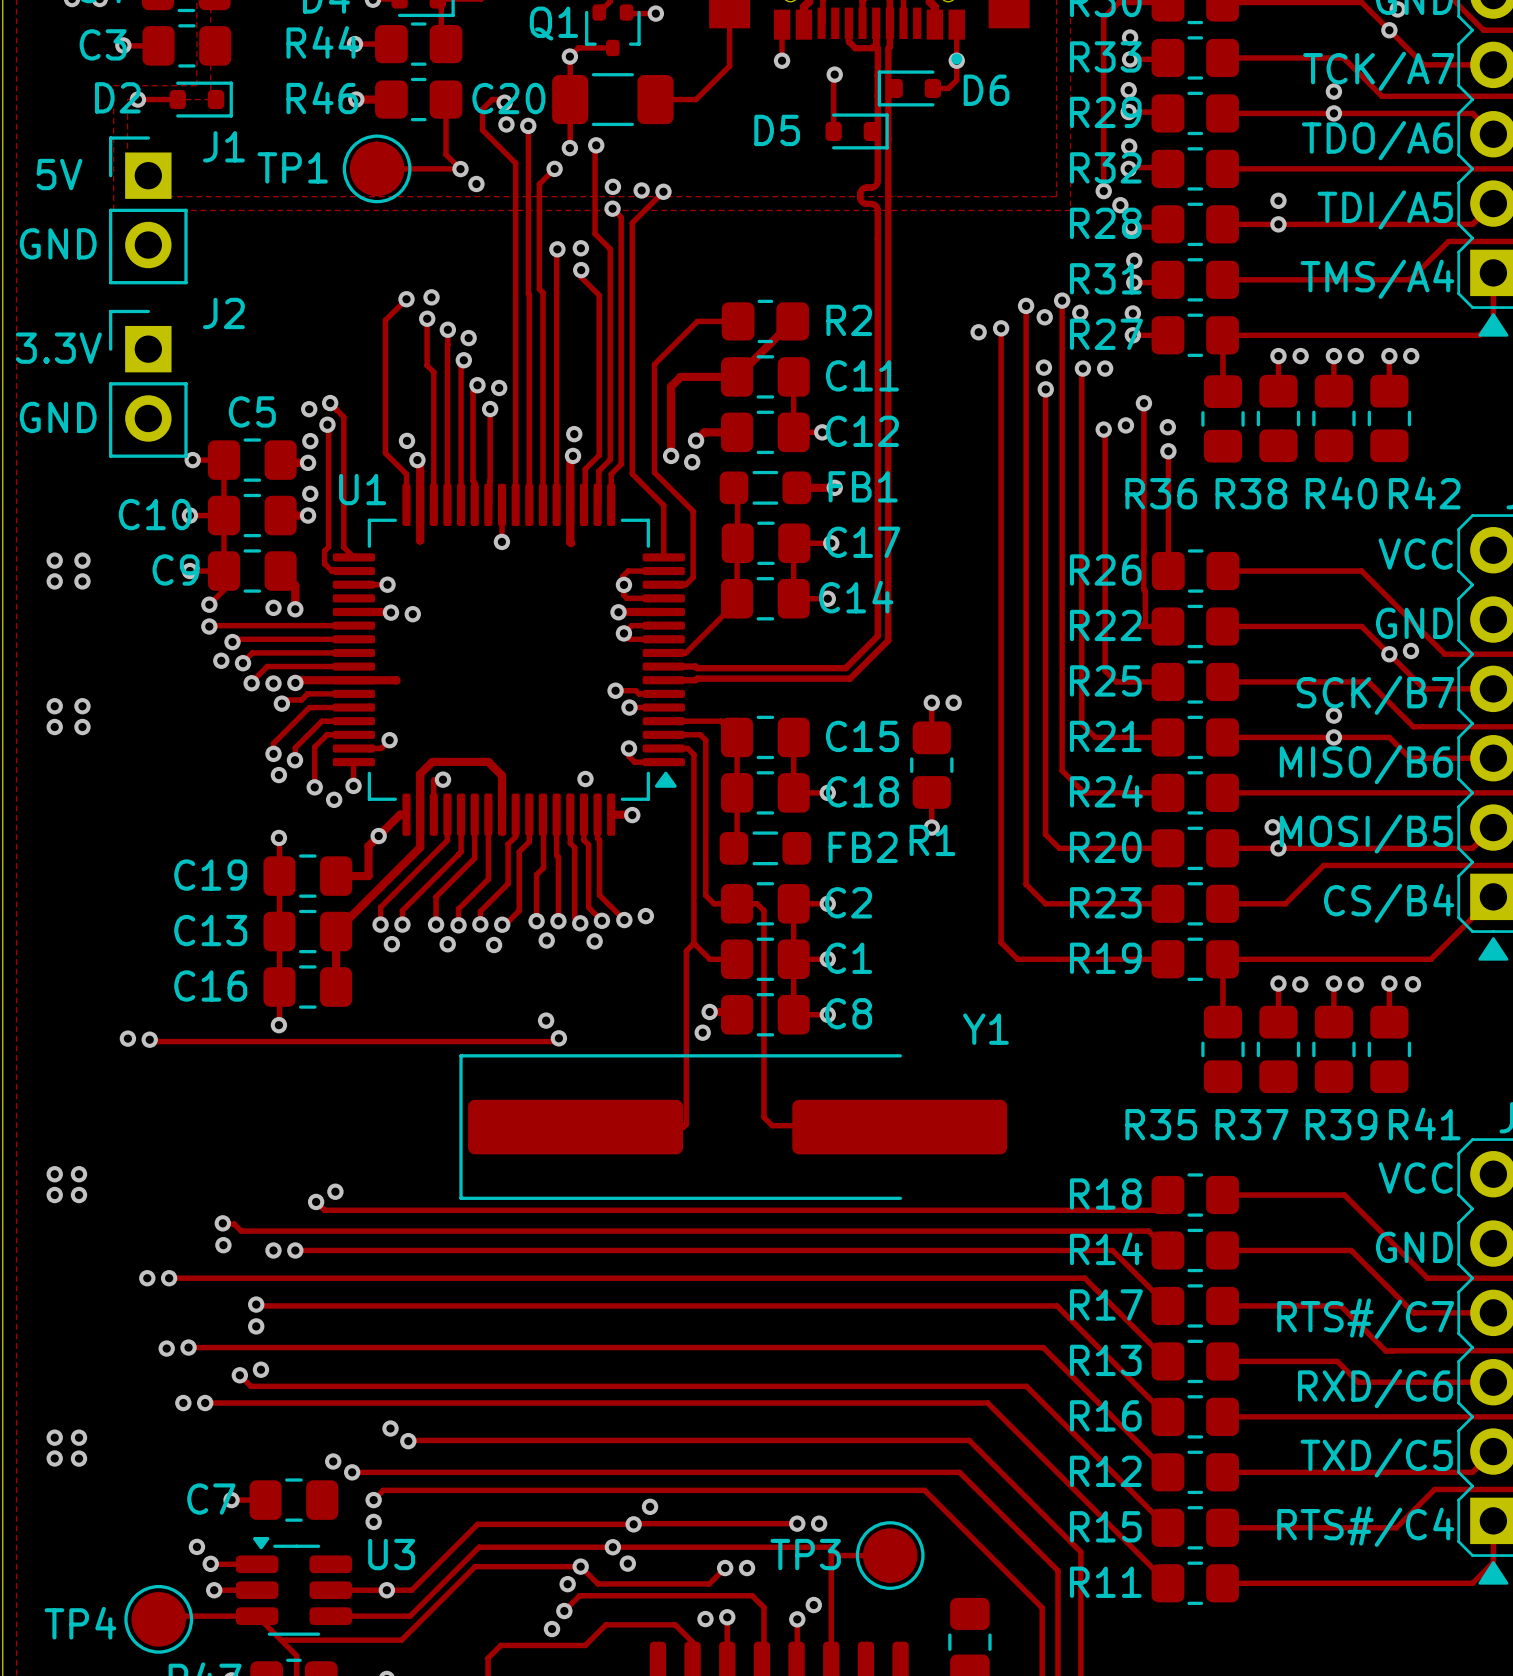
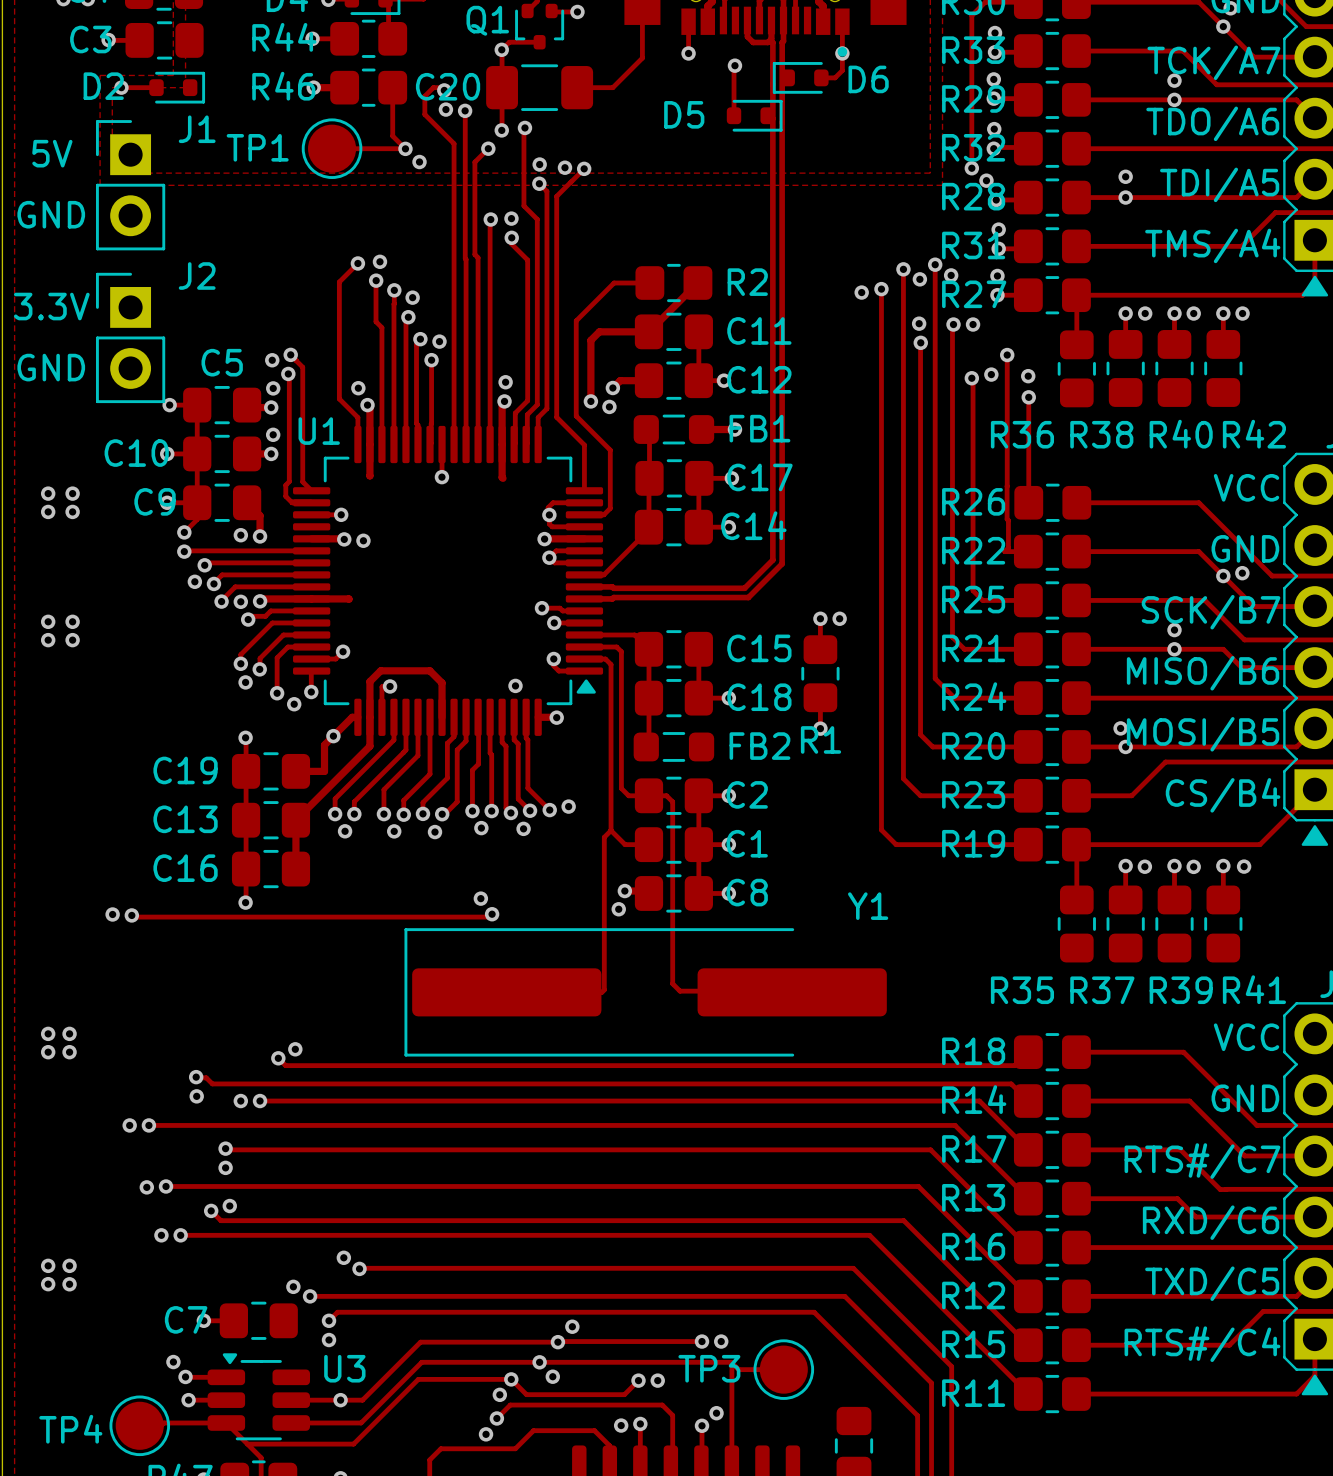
track: (877, 180) (874, 186) (862, 188) (860, 194) (862, 202) (874, 204) (877, 210) -> (772, 159) (772, 185)

